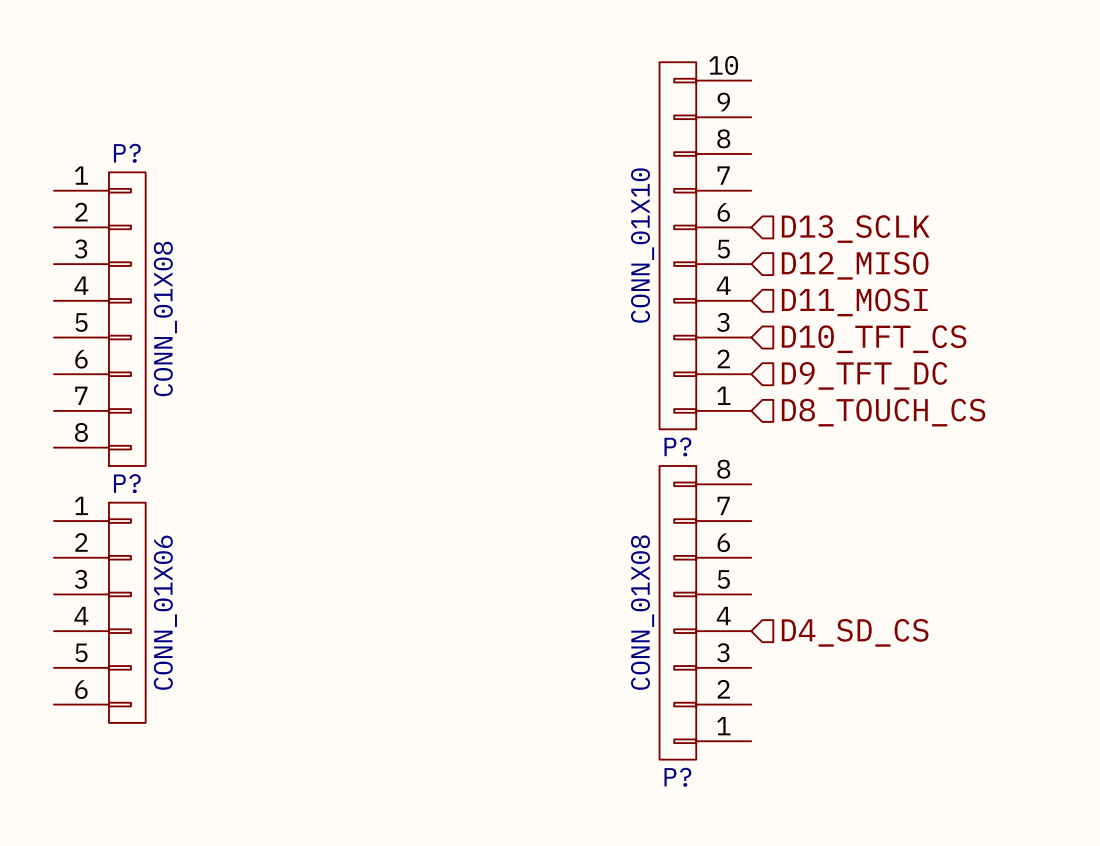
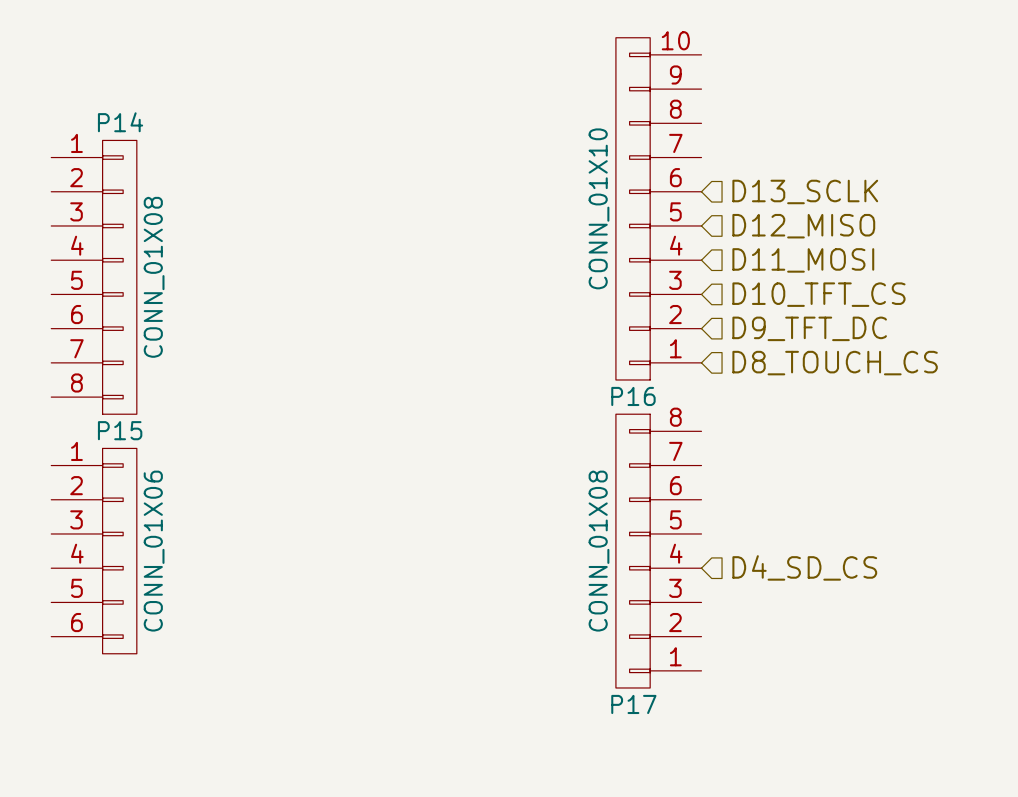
P? name: P? (127, 153) -> P14 (120, 122)
P? name: P? (677, 446) -> P16 (633, 396)
P? name: P? (127, 483) -> P15 (120, 430)
P? name: P? (677, 777) -> P17 (633, 704)

